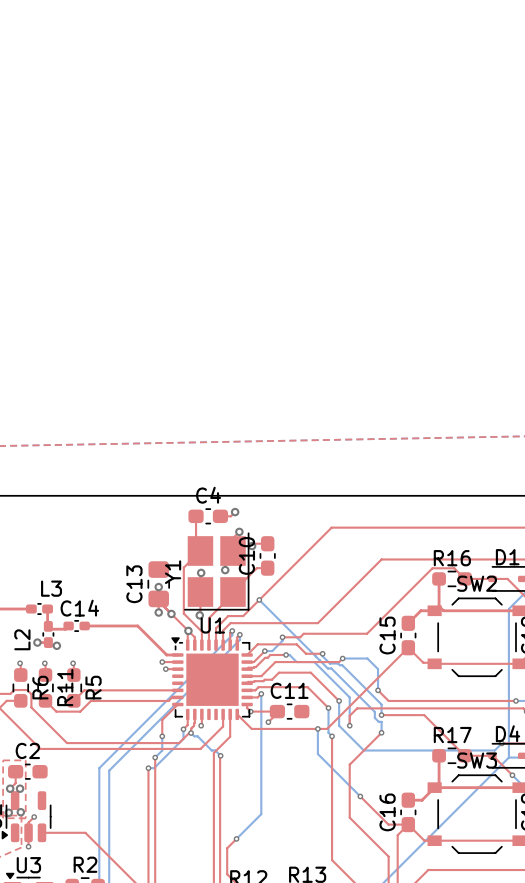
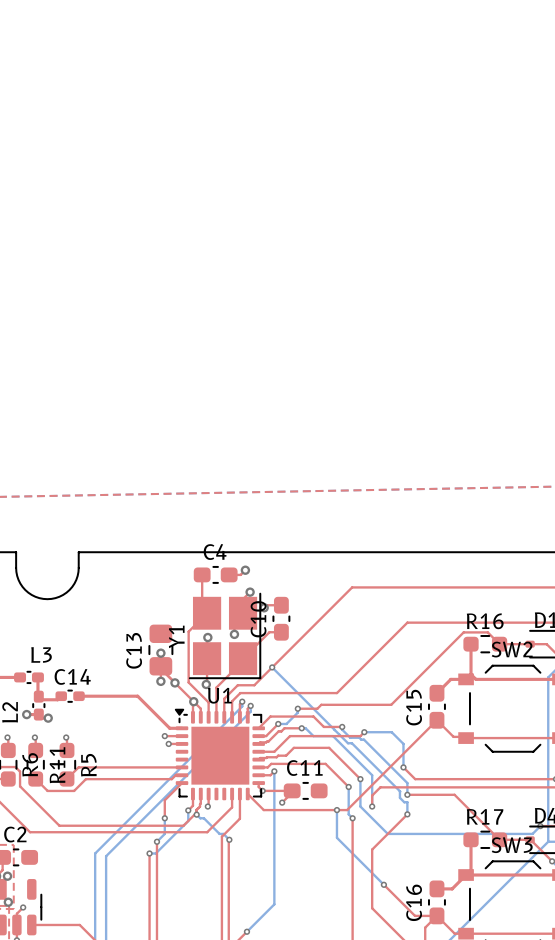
board edge: (27, 495) (84, 495) -> (16, 552) (16, 571) (20, 583) (31, 594) (47, 599) (63, 594) (74, 583) (78, 571) (78, 552)

